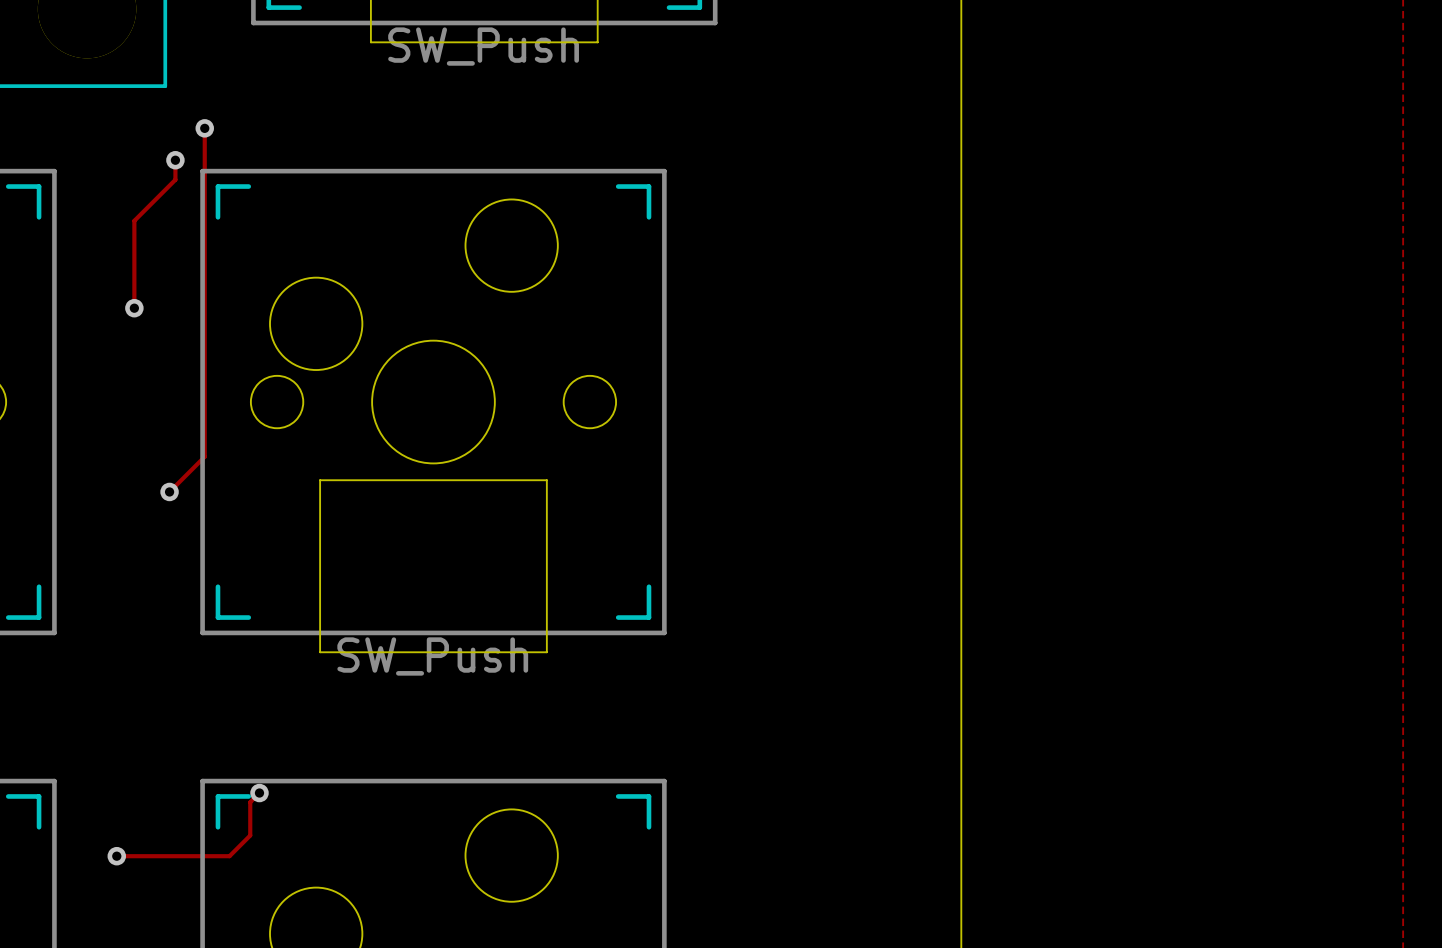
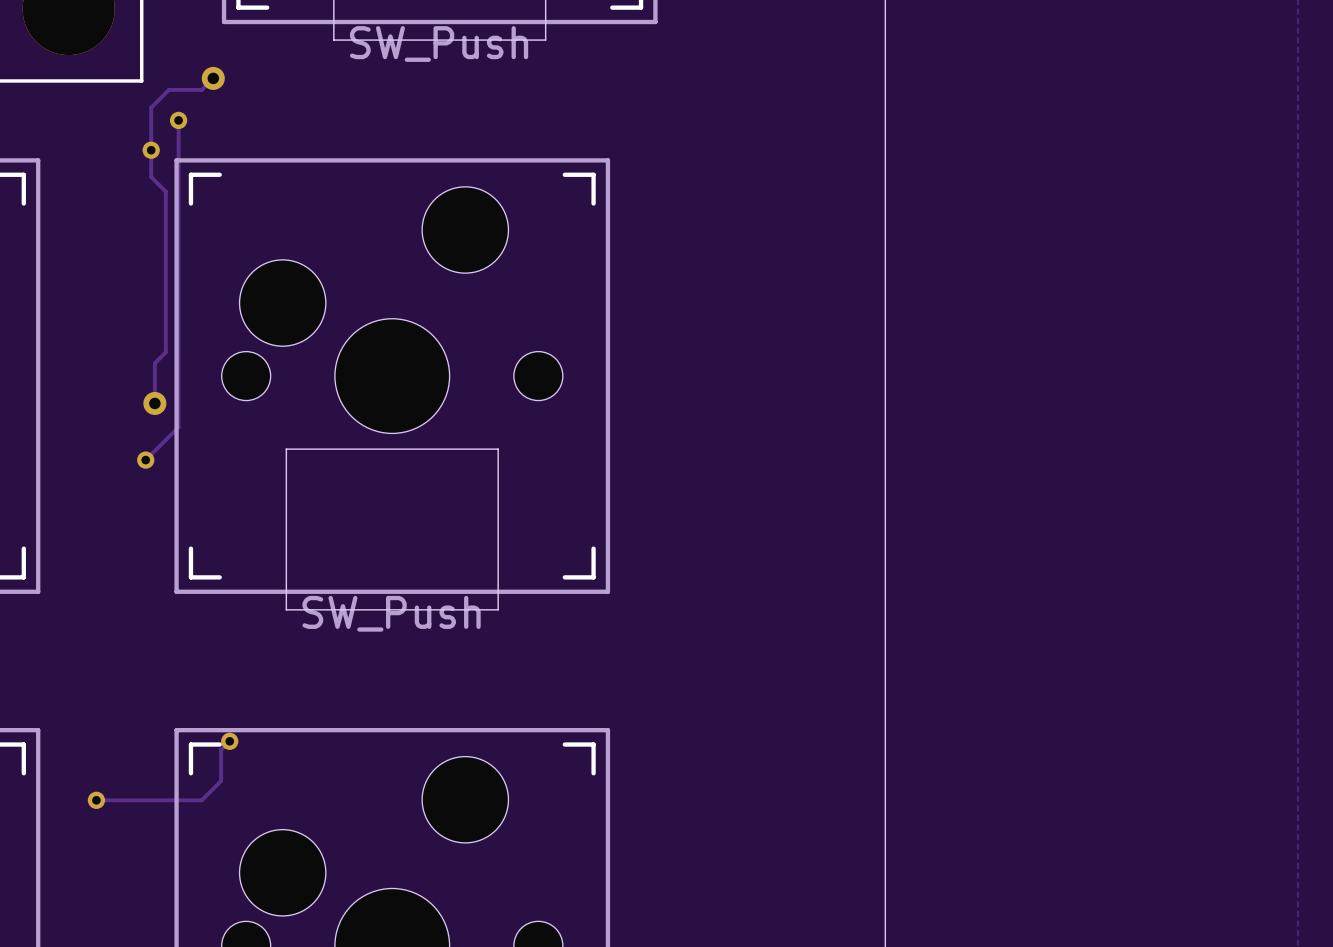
track: none -> (213, 78) (201, 89) (168, 89) (151, 107) (151, 150)
via: none -> (213, 78)
track: (175, 179) (134, 220) (134, 308) -> (151, 168) (151, 177) (165, 191) (165, 352) (154, 363) (154, 403)
via: (134, 308) -> none
via: none -> (154, 403)

